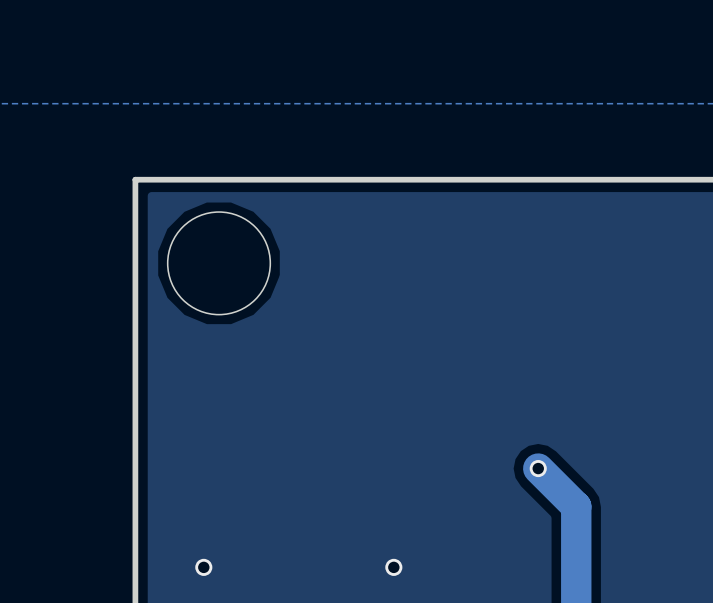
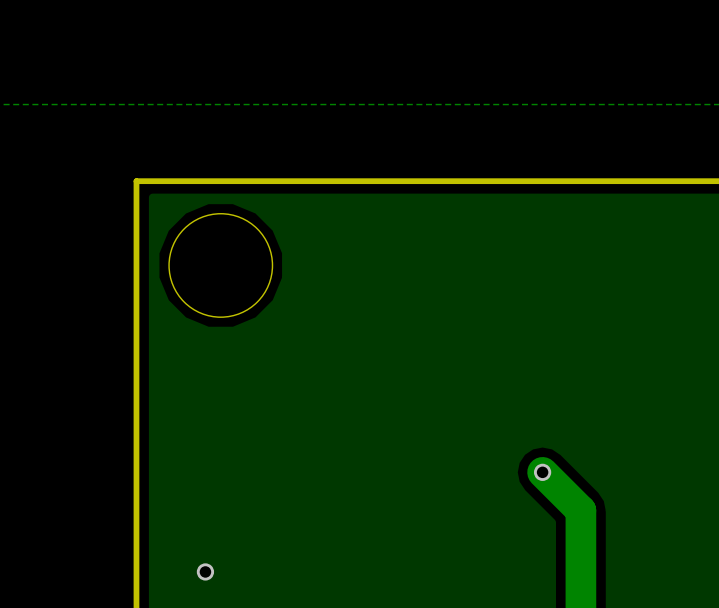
via: (393, 567) -> none

